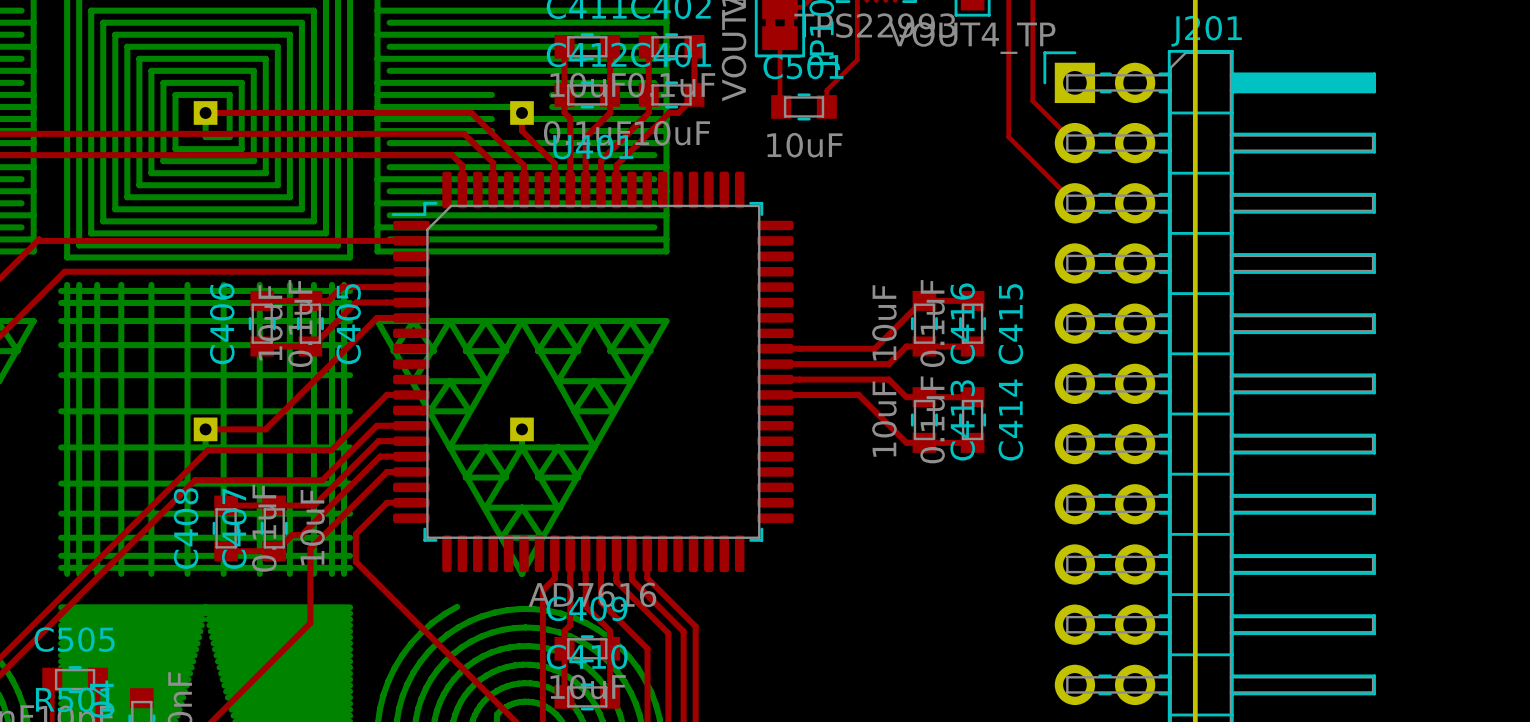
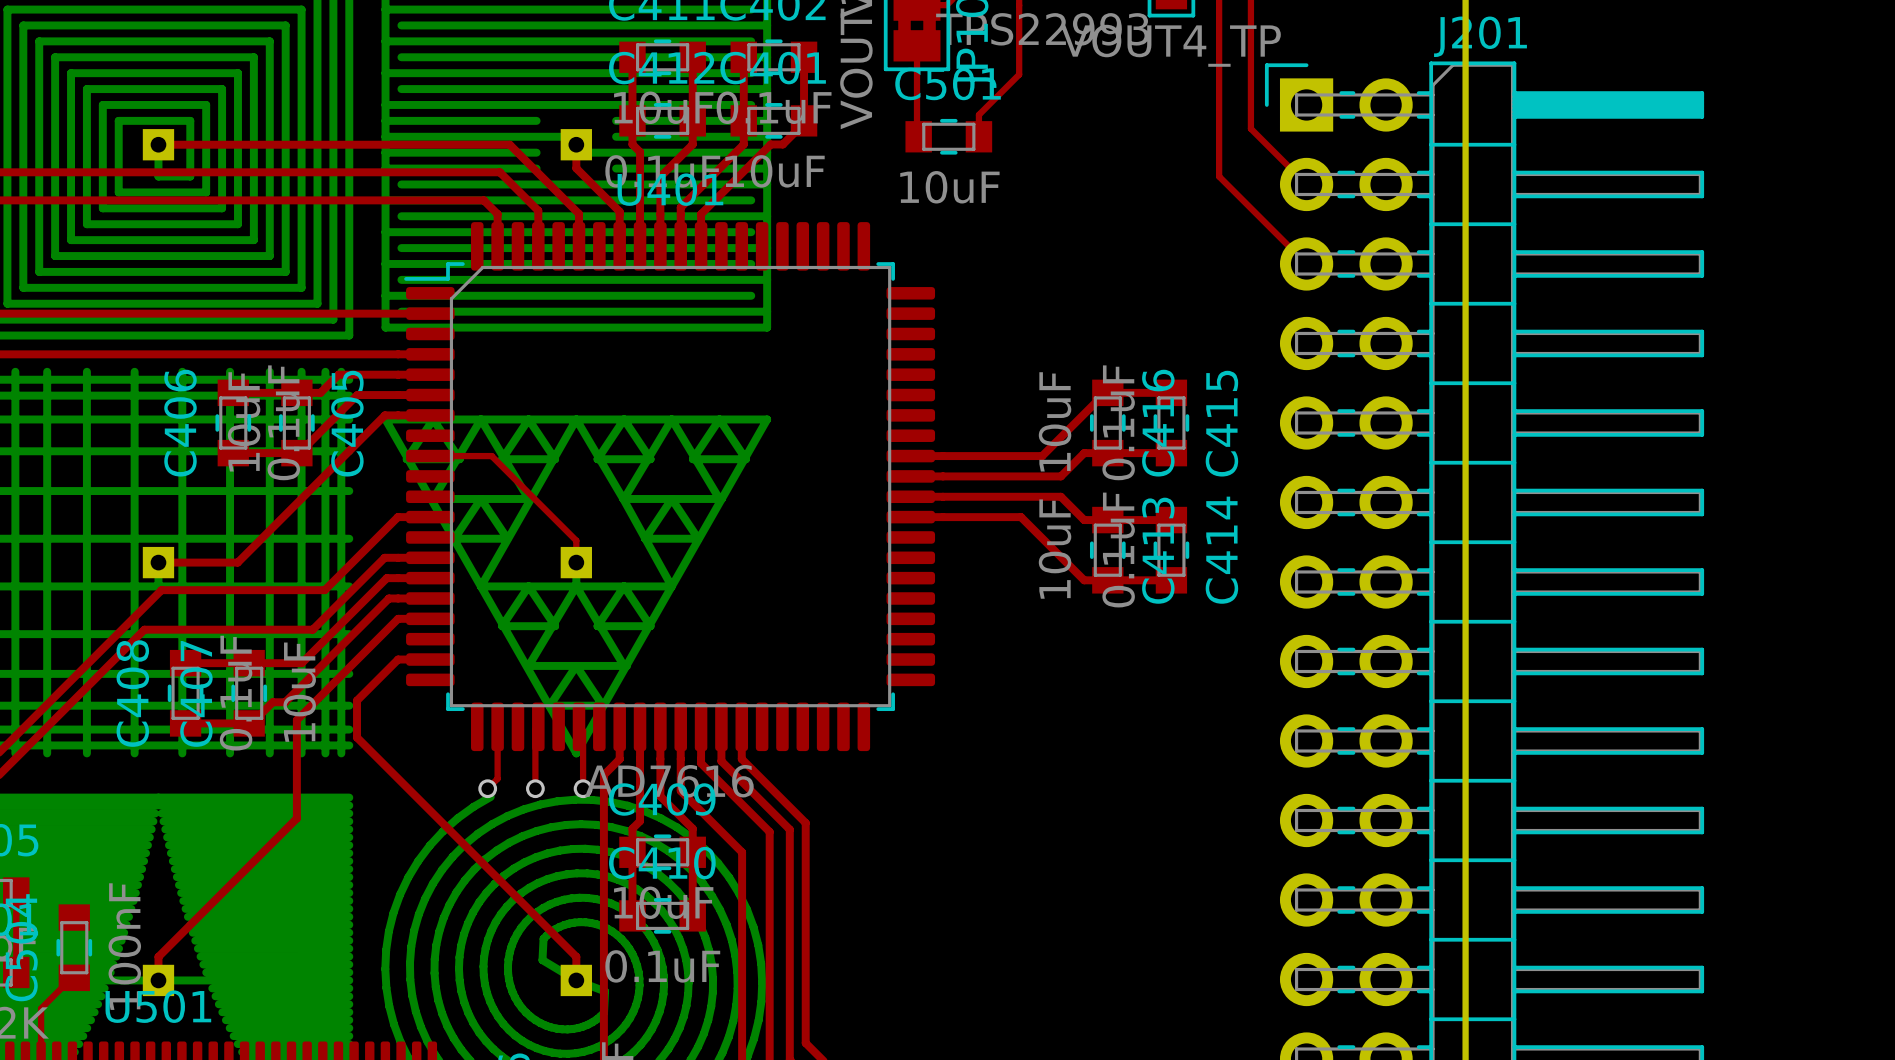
top track: none -> (430, 456) (491, 456) (576, 540) (576, 562)
top track: none -> (497, 726) (497, 778) (487, 788)
top track: none -> (538, 726) (535, 729) (535, 788)
top track: none -> (579, 726) (583, 730) (583, 788)
via: none -> (487, 788)
via: none -> (535, 788)
via: none -> (583, 788)

